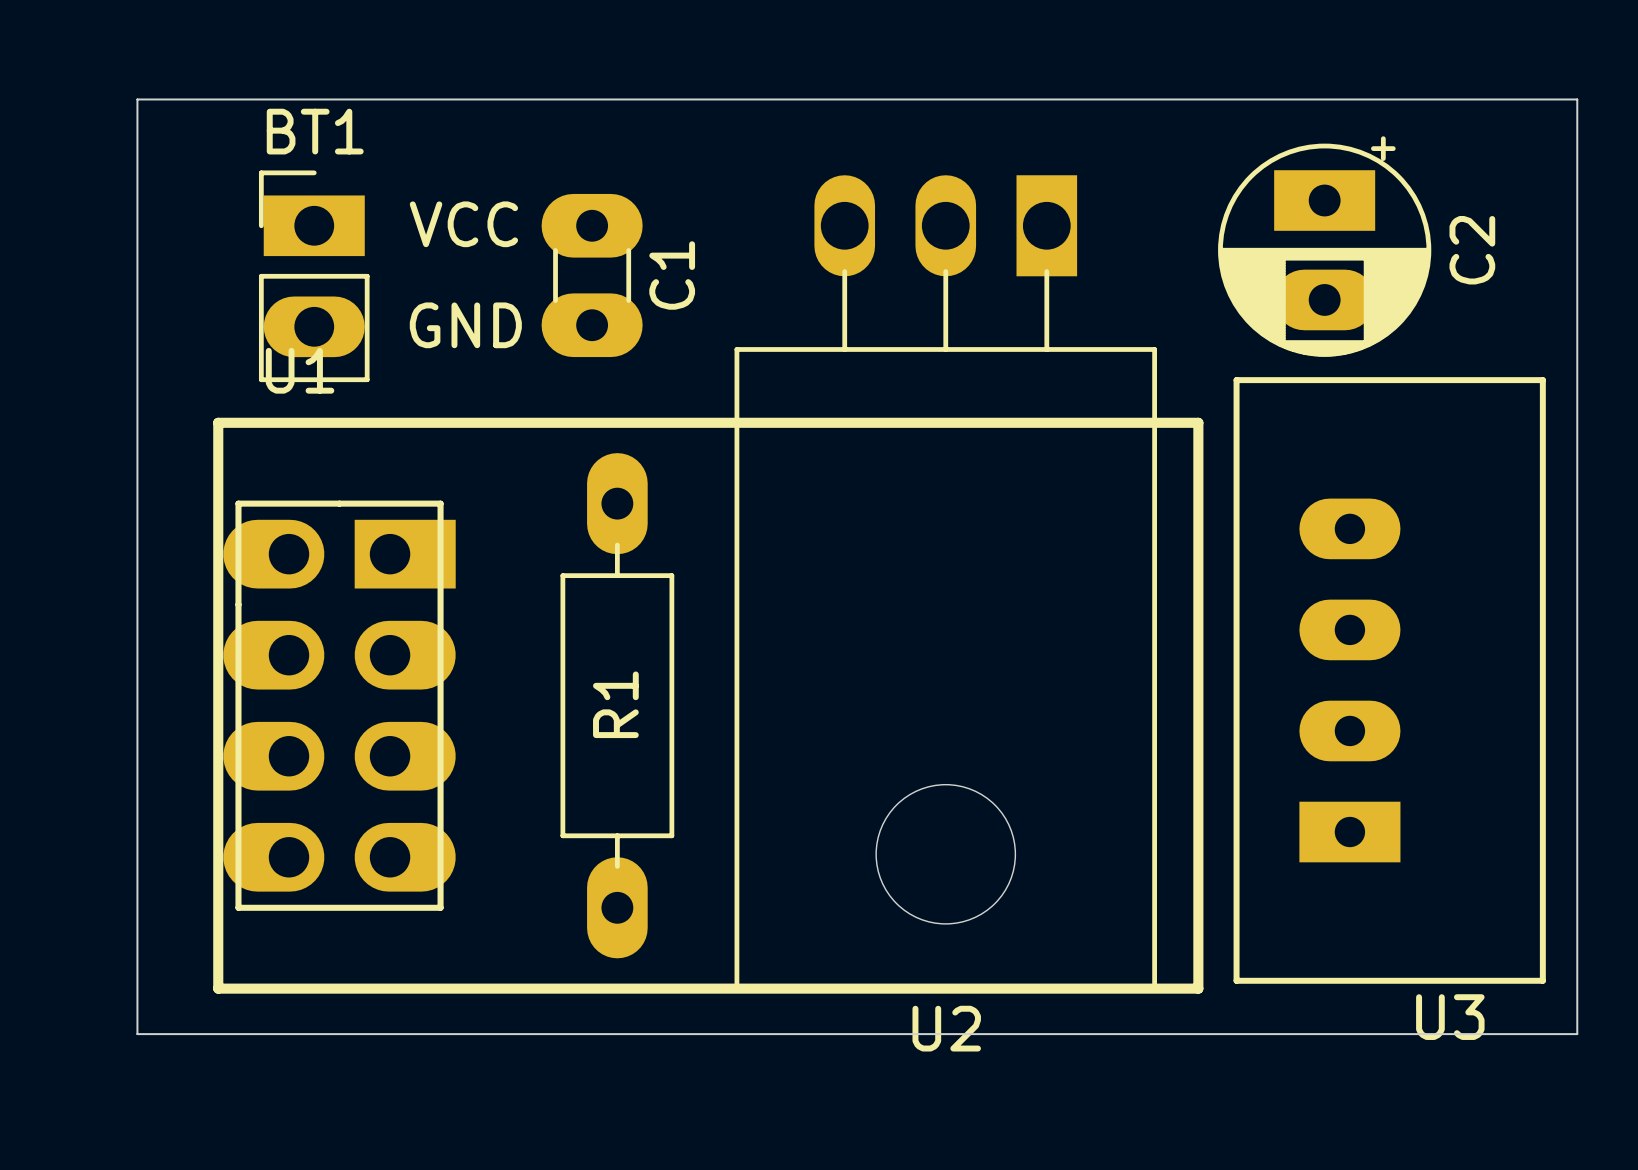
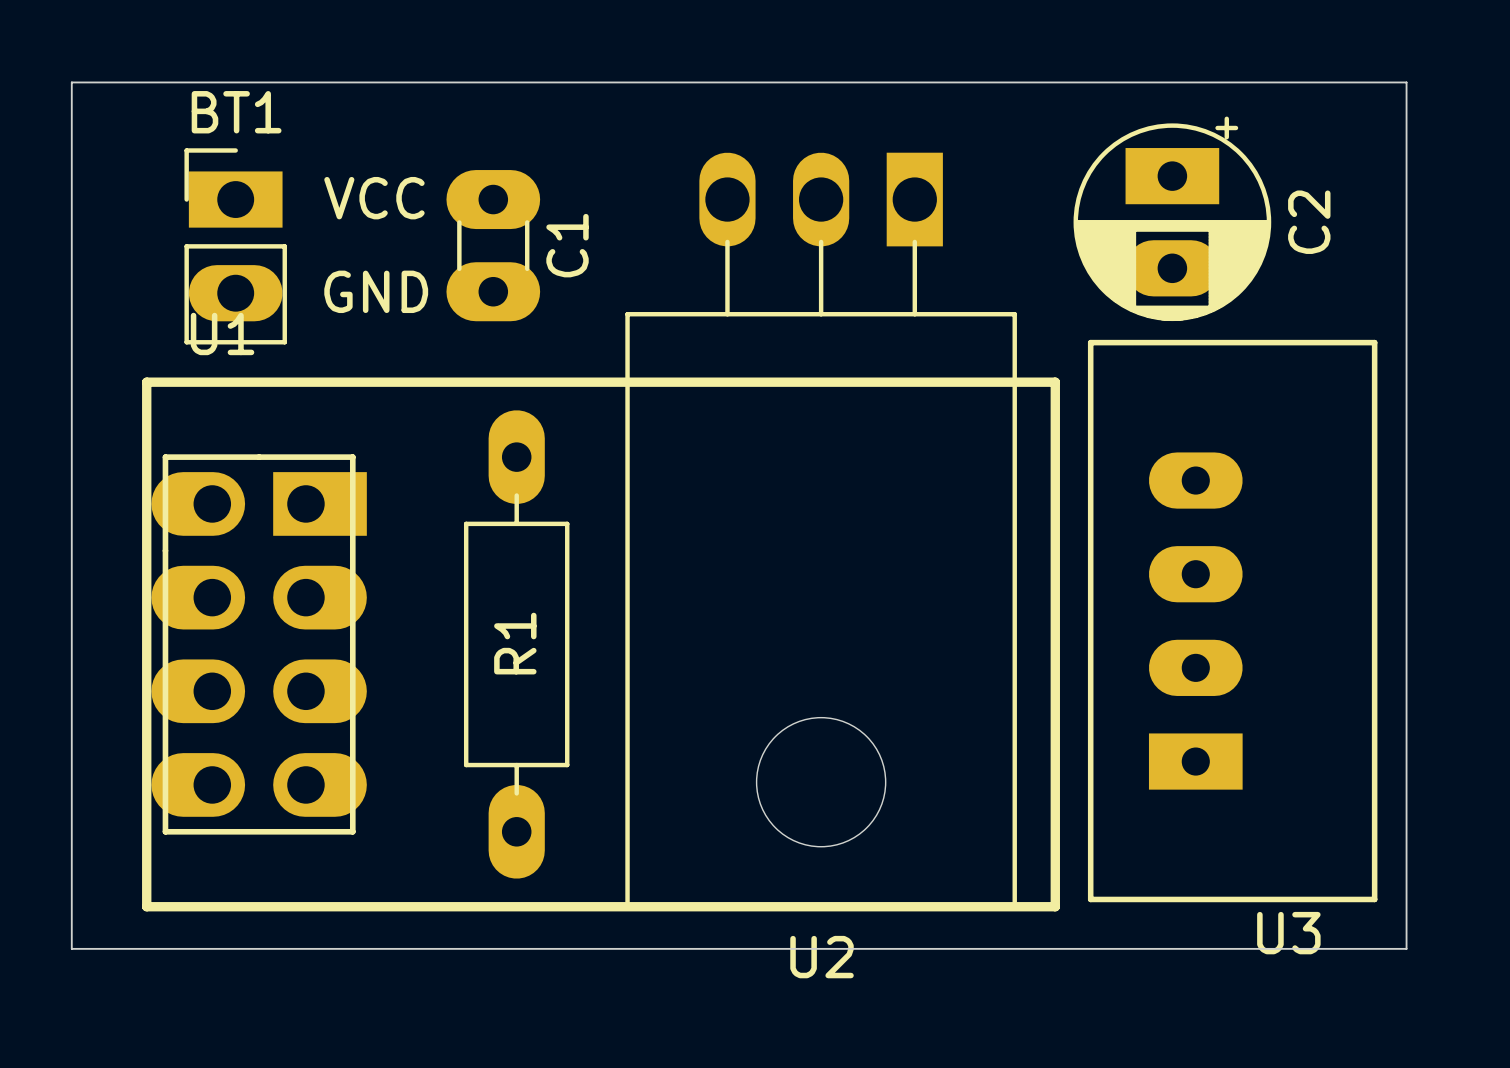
U2 name position: U2 (946, 1028) -> U2 (822, 957)

